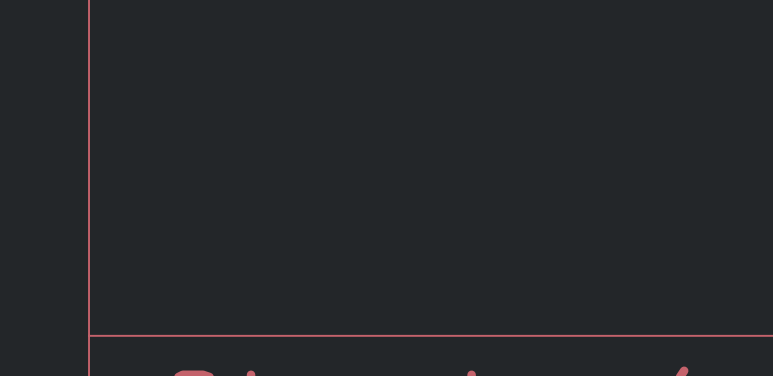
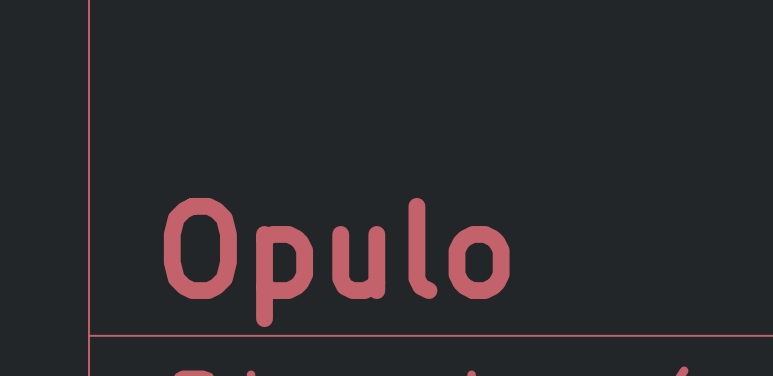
title block: none -> Opulo (336, 262)

